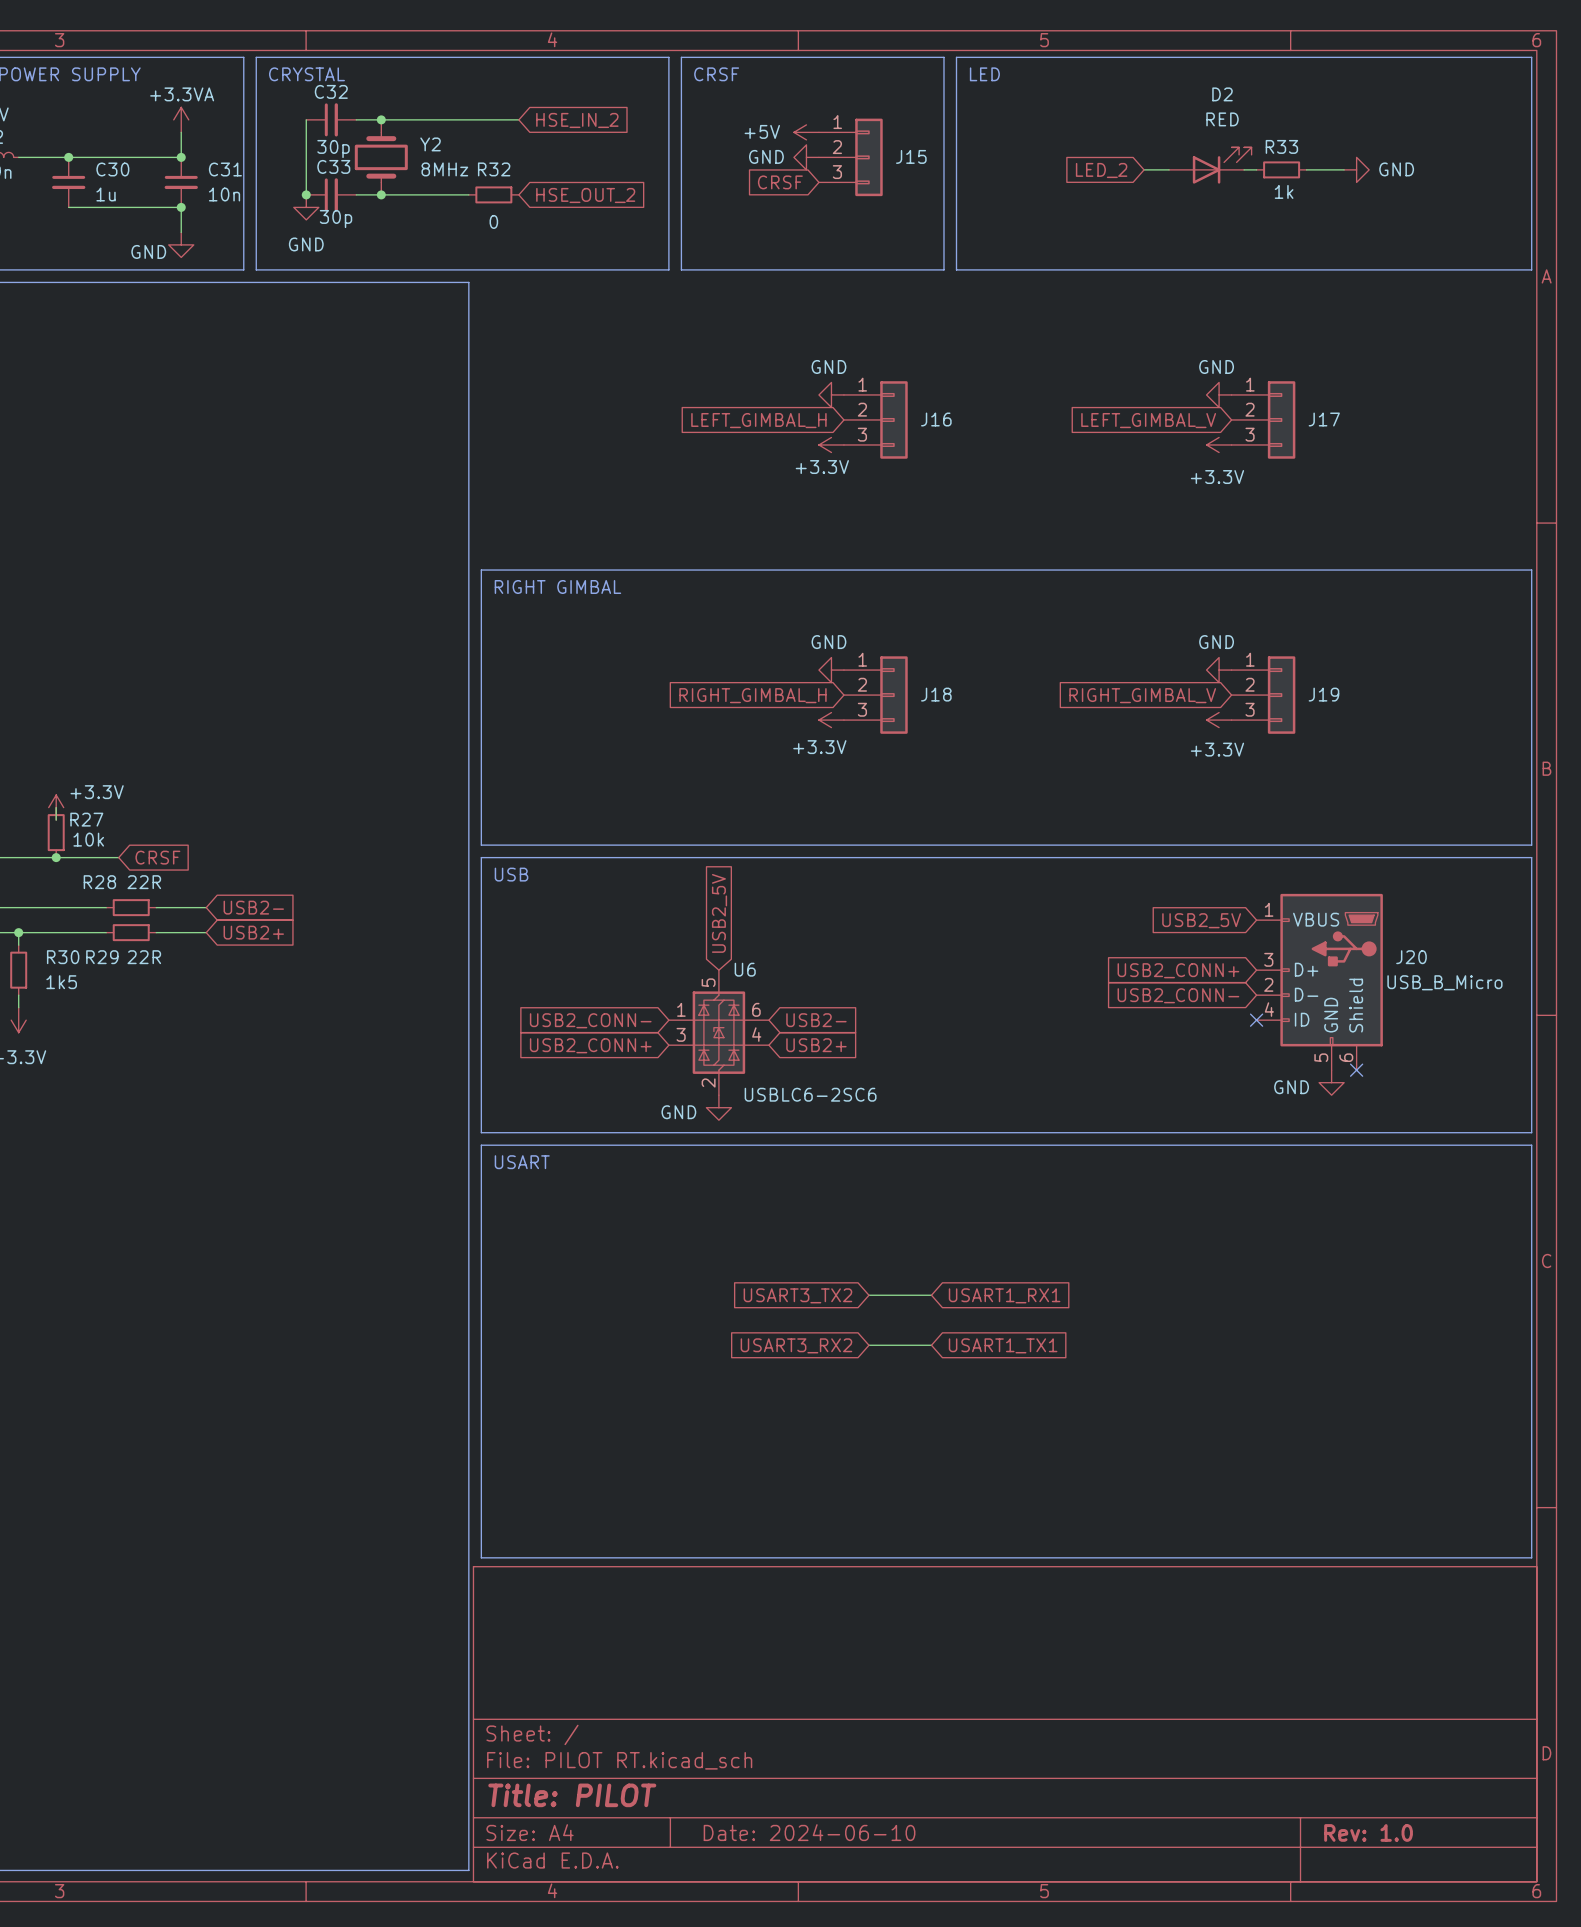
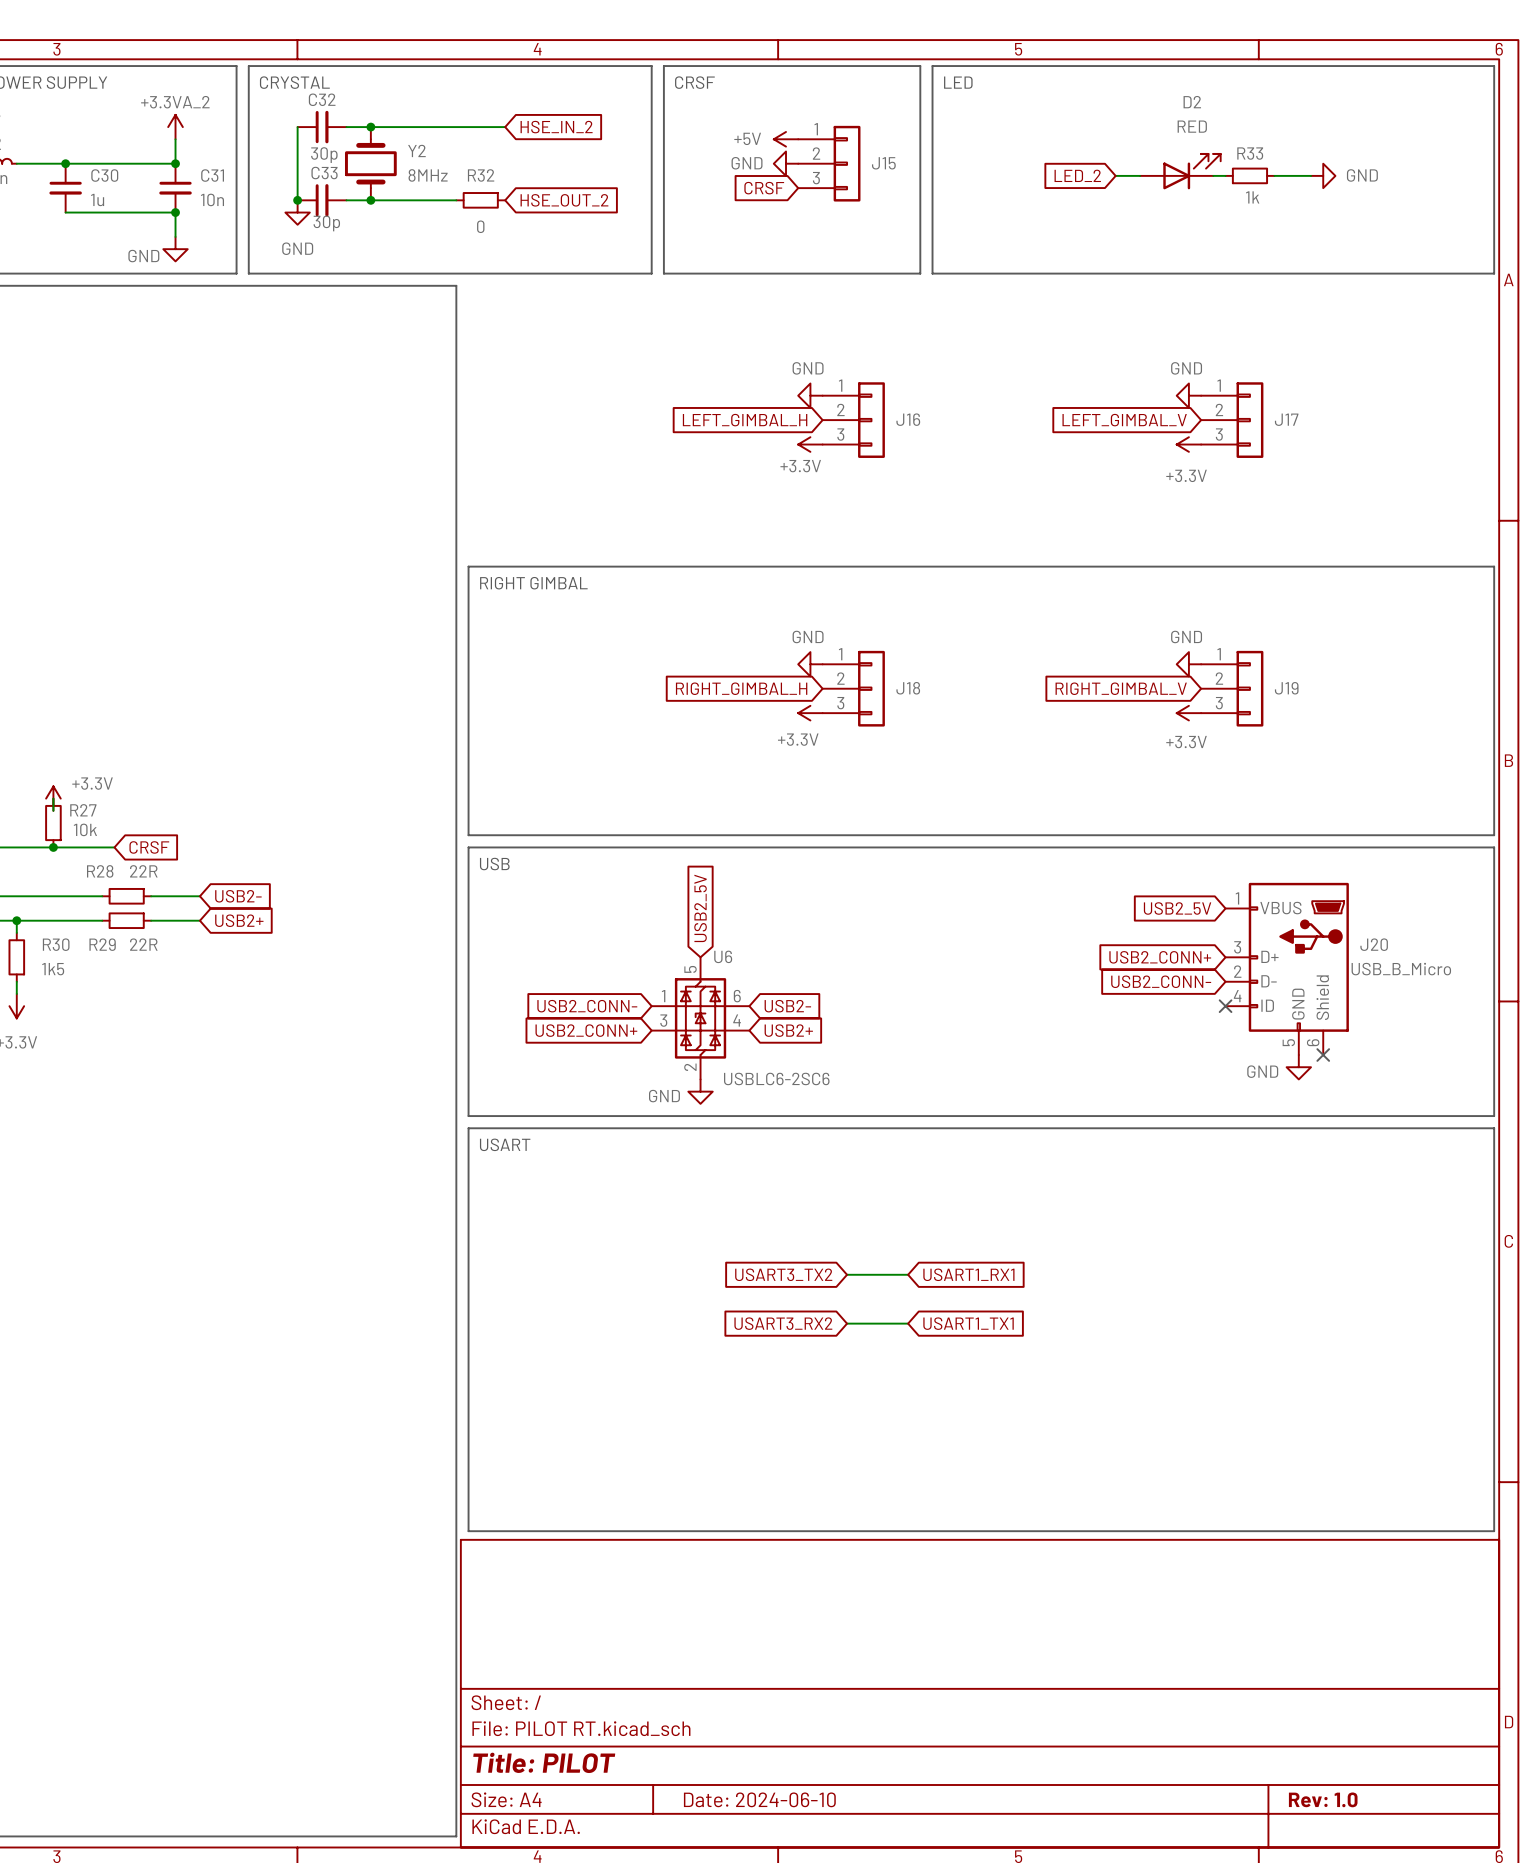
power symbol: +3.3VA (181, 119) -> +3.3VA_2 (175, 127)

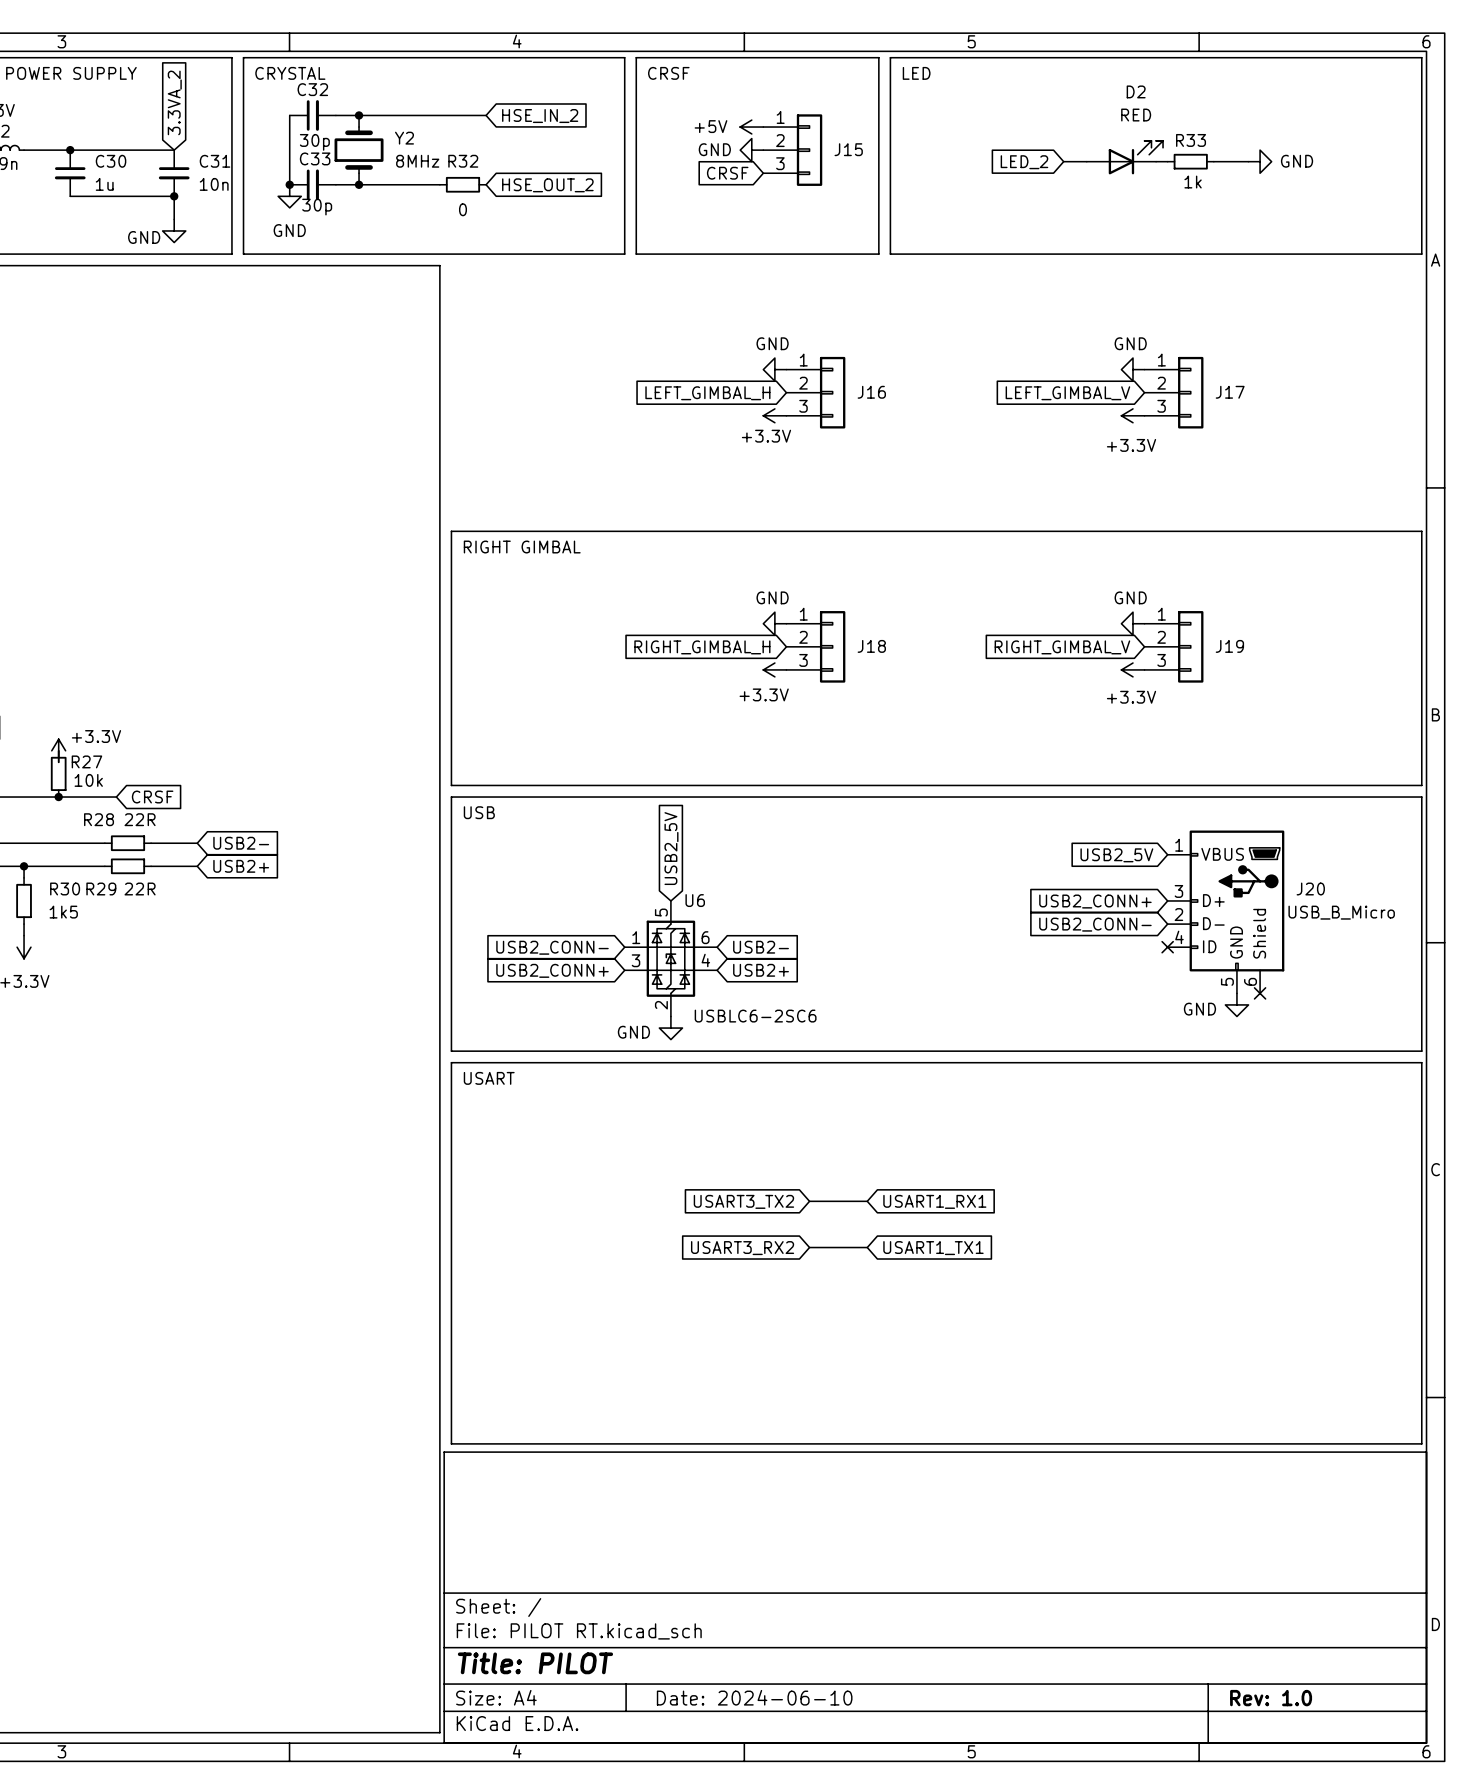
global label: none -> 3.3VA_2 (174, 102)
power symbol: +3.3VA_2 (175, 127) -> none
wire: (175, 139) (175, 163) -> none
junction: (175, 163) -> none

